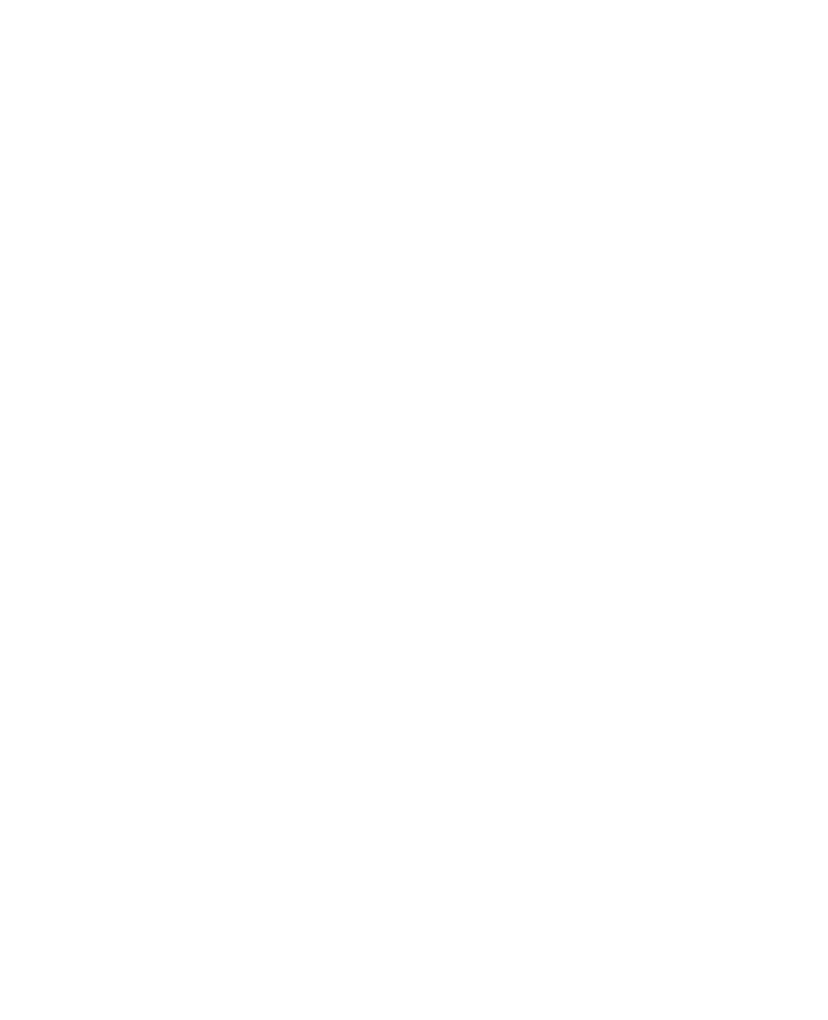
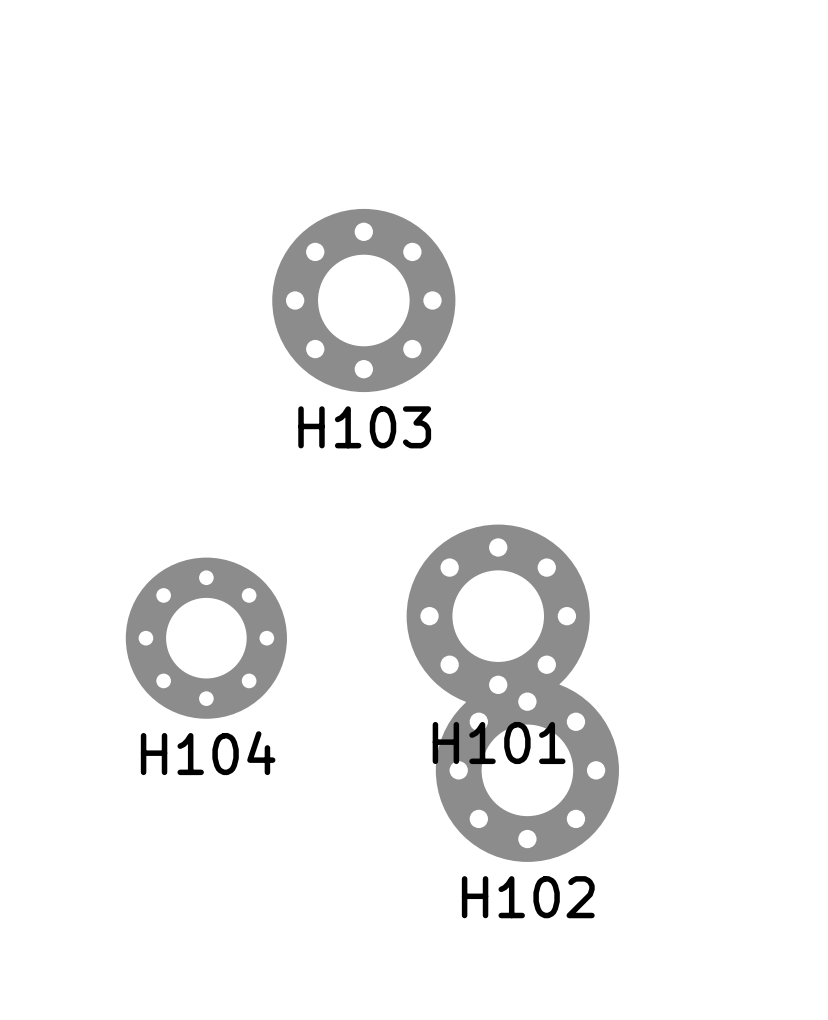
H103: none -> (363, 300)
H101: none -> (498, 616)
H104: none -> (206, 638)
H102: none -> (527, 770)

